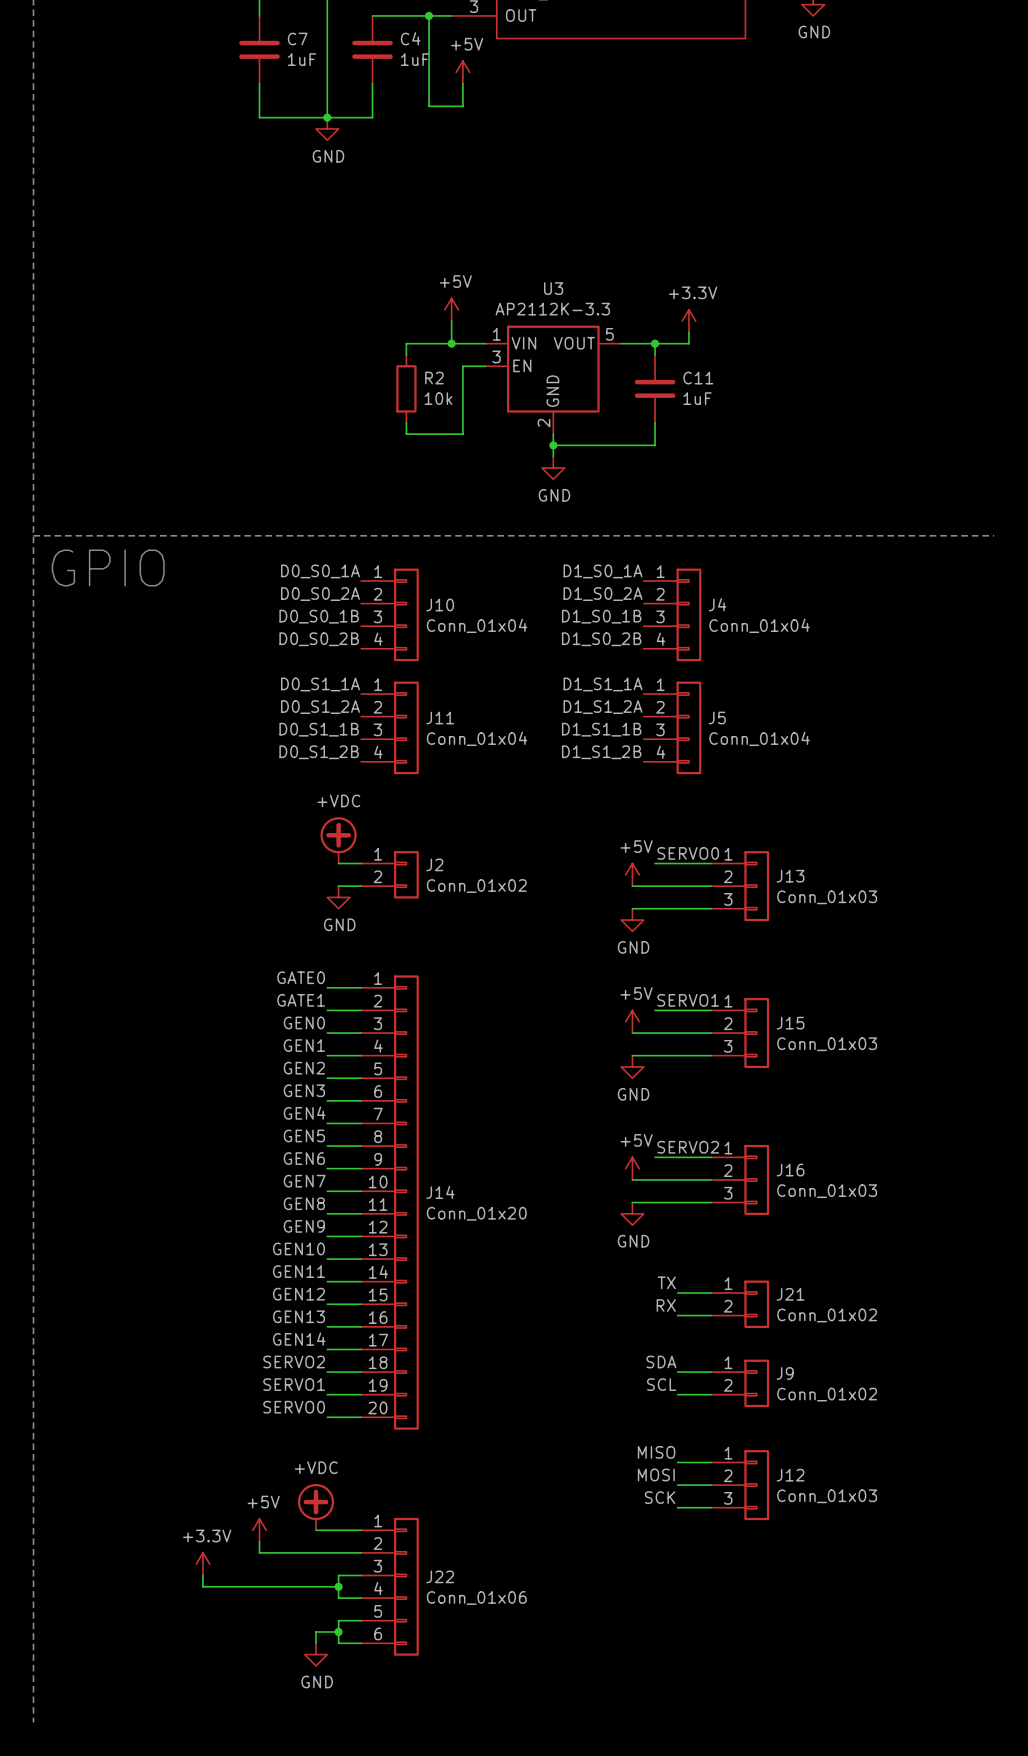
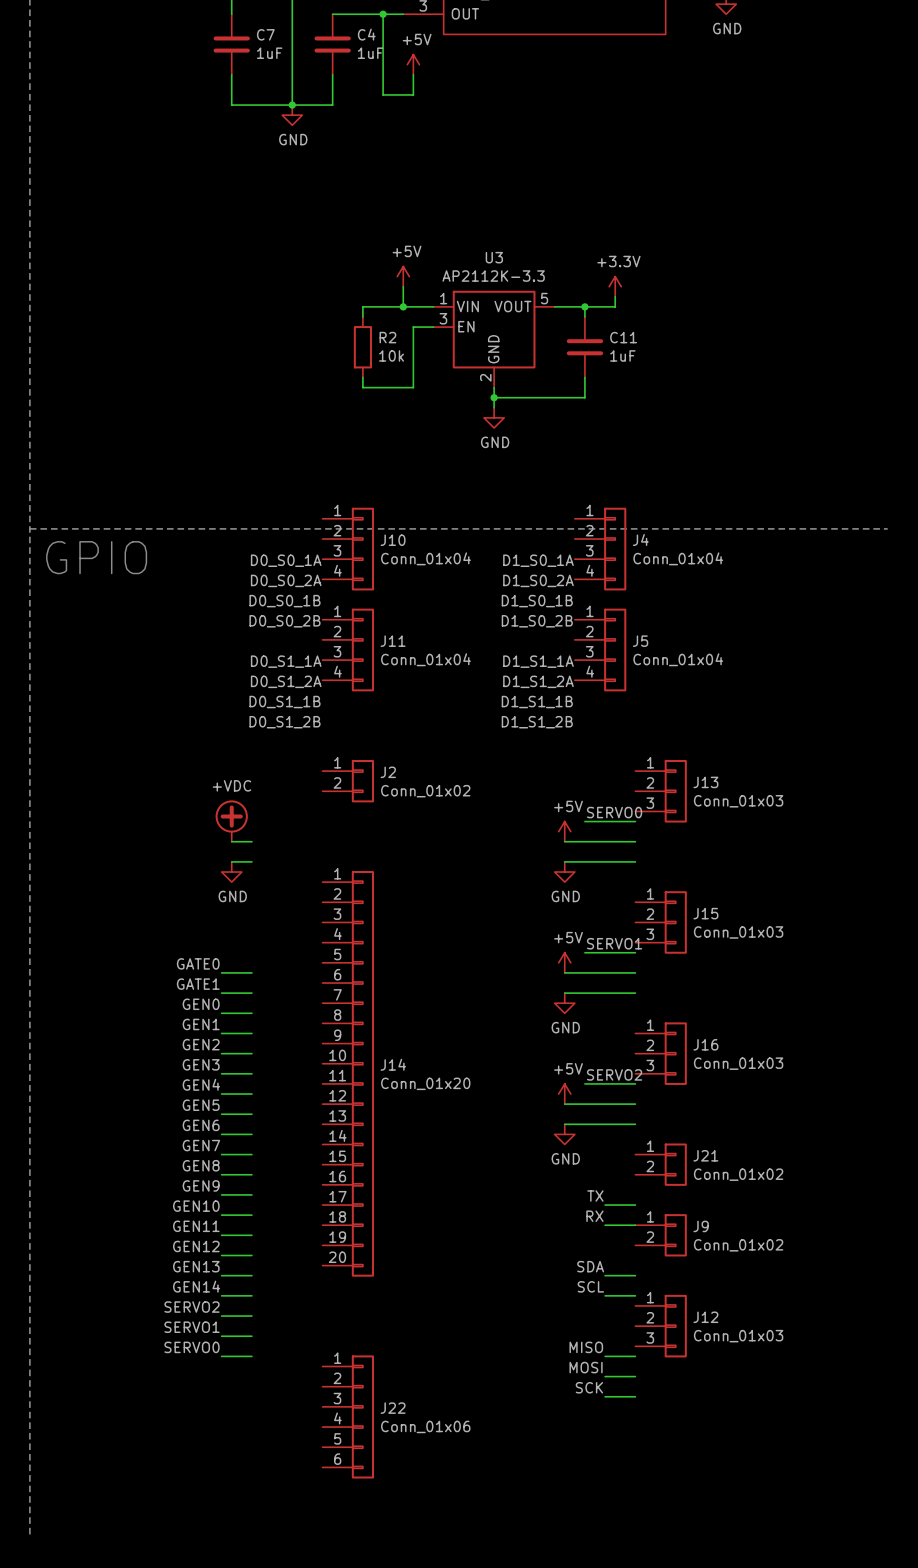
line: (33, 535) (994, 535) -> (29, 528) (887, 528)
text position: GPIO (108, 567) -> GPIO (96, 557)
label position: D0_S0_1A (320, 571) -> D0_S0_1A (286, 560)
label position: D1_S0_1A (603, 571) -> D1_S0_1A (538, 560)
label position: D0_S0_2A (320, 594) -> D0_S0_2A (286, 580)
label position: D1_S0_2A (603, 594) -> D1_S0_2A (538, 580)
label position: D0_S0_1B (319, 616) -> D0_S0_1B (284, 601)
label position: D1_S0_1B (601, 616) -> D1_S0_1B (537, 601)
label position: D0_S0_2B (319, 639) -> D0_S0_2B (284, 621)
label position: D1_S0_2B (601, 639) -> D1_S0_2B (537, 621)
label position: D0_S1_1A (320, 684) -> D0_S1_1A (286, 661)
label position: D1_S1_1A (603, 684) -> D1_S1_1A (538, 661)
label position: D0_S1_2A (320, 707) -> D0_S1_2A (286, 681)
label position: D1_S1_2A (603, 707) -> D1_S1_2A (538, 681)
label position: D0_S1_1B (319, 729) -> D0_S1_1B (284, 702)
label position: D1_S1_1B (601, 729) -> D1_S1_1B (537, 702)
label position: D0_S1_2B (319, 752) -> D0_S1_2B (284, 722)
label position: D1_S1_2B (601, 752) -> D1_S1_2B (537, 722)
power symbol position: +VDC (338, 840) -> +VDC (231, 821)
label position: SERVO0 (688, 853) -> SERVO0 (614, 812)
wire: (338, 863) (361, 863) -> (231, 841) (251, 841)
wire: (655, 863) (711, 863) -> (584, 821) (635, 821)
power symbol: +5V (632, 874) -> none
wire: (338, 886) (361, 886) -> (231, 861) (251, 861)
wire: (632, 886) (711, 886) -> (564, 841) (635, 841)
power symbol position: GND (338, 897) -> GND (231, 872)
wire: (632, 908) (711, 908) -> (564, 861) (635, 861)
power symbol: GND (632, 920) -> none
power symbol: none -> +5V (564, 831)
power symbol: none -> GND (564, 872)
label position: GATE0 (301, 977) -> GATE0 (198, 963)
wire: (327, 987) (361, 987) -> none
label position: GATE1 (301, 1000) -> GATE1 (198, 984)
label position: SERVO1 (688, 1000) -> SERVO1 (614, 943)
wire: (327, 1010) (361, 1010) -> (221, 972) (251, 972)
wire: (655, 1010) (711, 1010) -> (584, 952) (635, 952)
power symbol: +5V (632, 1021) -> none
label position: GEN0 (304, 1022) -> GEN0 (201, 1004)
wire: (327, 1033) (361, 1033) -> (221, 993) (251, 993)
wire: (632, 1033) (711, 1033) -> (564, 972) (635, 972)
label position: GEN1 (304, 1045) -> GEN1 (201, 1024)
wire: (327, 1055) (361, 1055) -> (221, 1013) (251, 1013)
wire: (632, 1055) (711, 1055) -> (564, 993) (635, 993)
power symbol: GND (632, 1066) -> none
label position: GEN2 (304, 1068) -> GEN2 (201, 1044)
wire: (327, 1078) (361, 1078) -> (221, 1033) (251, 1033)
power symbol: none -> +5V (564, 962)
label position: GEN3 (304, 1090) -> GEN3 (201, 1064)
wire: (327, 1100) (361, 1100) -> (221, 1053) (251, 1053)
label position: GEN4 (304, 1113) -> GEN4 (201, 1084)
wire: (327, 1123) (361, 1123) -> (221, 1073) (251, 1073)
power symbol: none -> GND (564, 1003)
label position: GEN5 (304, 1135) -> GEN5 (201, 1105)
wire: (327, 1146) (361, 1146) -> (221, 1094) (251, 1094)
label position: SERVO2 (688, 1147) -> SERVO2 (614, 1074)
wire: (655, 1157) (711, 1157) -> (584, 1083) (635, 1083)
label position: GEN6 (304, 1158) -> GEN6 (201, 1125)
wire: (327, 1168) (361, 1168) -> (221, 1114) (251, 1114)
power symbol: +5V (632, 1168) -> none
wire: (632, 1179) (711, 1179) -> (564, 1104) (635, 1104)
label position: GEN7 (304, 1181) -> GEN7 (201, 1145)
wire: (327, 1191) (361, 1191) -> (221, 1134) (251, 1134)
wire: (632, 1202) (711, 1202) -> (564, 1124) (635, 1124)
label position: GEN8 (304, 1203) -> GEN8 (201, 1165)
wire: (327, 1213) (361, 1213) -> (221, 1154) (251, 1154)
power symbol: GND (632, 1213) -> none
power symbol: none -> +5V (564, 1094)
label position: GEN9 (304, 1226) -> GEN9 (201, 1185)
wire: (327, 1236) (361, 1236) -> (221, 1174) (251, 1174)
label position: GEN10 (298, 1248) -> GEN10 (196, 1206)
wire: (327, 1259) (361, 1259) -> (221, 1194) (251, 1194)
power symbol: none -> GND (564, 1134)
label position: GEN11 (298, 1271) -> GEN11 (196, 1226)
wire: (327, 1281) (361, 1281) -> (221, 1215) (251, 1215)
label position: TX (666, 1282) -> TX (595, 1196)
wire: (677, 1292) (711, 1292) -> (605, 1205) (635, 1205)
label position: GEN12 (298, 1294) -> GEN12 (196, 1246)
wire: (327, 1304) (361, 1304) -> (221, 1235) (251, 1235)
label: RX (666, 1305) -> none
wire: (677, 1315) (711, 1315) -> (605, 1275) (635, 1275)
label position: GEN13 (298, 1316) -> GEN13 (196, 1266)
wire: (327, 1326) (361, 1326) -> (221, 1255) (251, 1255)
label position: GEN14 (299, 1339) -> GEN14 (196, 1286)
wire: (327, 1349) (361, 1349) -> (221, 1275) (251, 1275)
label position: SERVO2 (294, 1361) -> SERVO2 (192, 1307)
label: SDA (661, 1361) -> RX (594, 1216)
wire: (327, 1372) (361, 1372) -> (221, 1295) (251, 1295)
label position: SERVO1 (294, 1384) -> SERVO1 (192, 1327)
label position: SCL (661, 1384) -> SCL (590, 1286)
wire: (327, 1394) (361, 1394) -> (221, 1316) (251, 1316)
wire: (677, 1394) (711, 1394) -> (605, 1295) (635, 1295)
label position: SERVO0 (294, 1407) -> SERVO0 (192, 1347)
wire: (327, 1417) (361, 1417) -> (221, 1336) (251, 1336)
label: none -> SDA (590, 1266)
label position: MISO (656, 1452) -> MISO (586, 1347)
wire: (677, 1462) (711, 1462) -> (605, 1356) (635, 1356)
label position: MOSI (656, 1475) -> MOSI (586, 1367)
wire: (677, 1485) (711, 1485) -> (605, 1376) (635, 1376)
label position: SCK (660, 1497) -> SCK (589, 1387)
power symbol: +VDC (316, 1507) -> none
wire: (677, 1507) (711, 1507) -> (605, 1396) (635, 1396)
wire: none -> (221, 1356) (251, 1356)
power symbol: +5V (259, 1530) -> none
wire: (316, 1530) (361, 1530) -> none
wire: (259, 1541) (259, 1552) (361, 1552) -> none
power symbol: +3.3V (202, 1564) -> none
wire: (202, 1575) (202, 1586) (338, 1586) -> none
wire: (361, 1575) (338, 1575) (338, 1598) (361, 1598) -> none
junction: (338, 1586) -> none
wire: (361, 1620) (338, 1620) (338, 1643) (361, 1643) -> none
wire: (338, 1632) (316, 1632) (316, 1643) -> none
junction: (338, 1632) -> none
power symbol: GND (316, 1654) -> none

